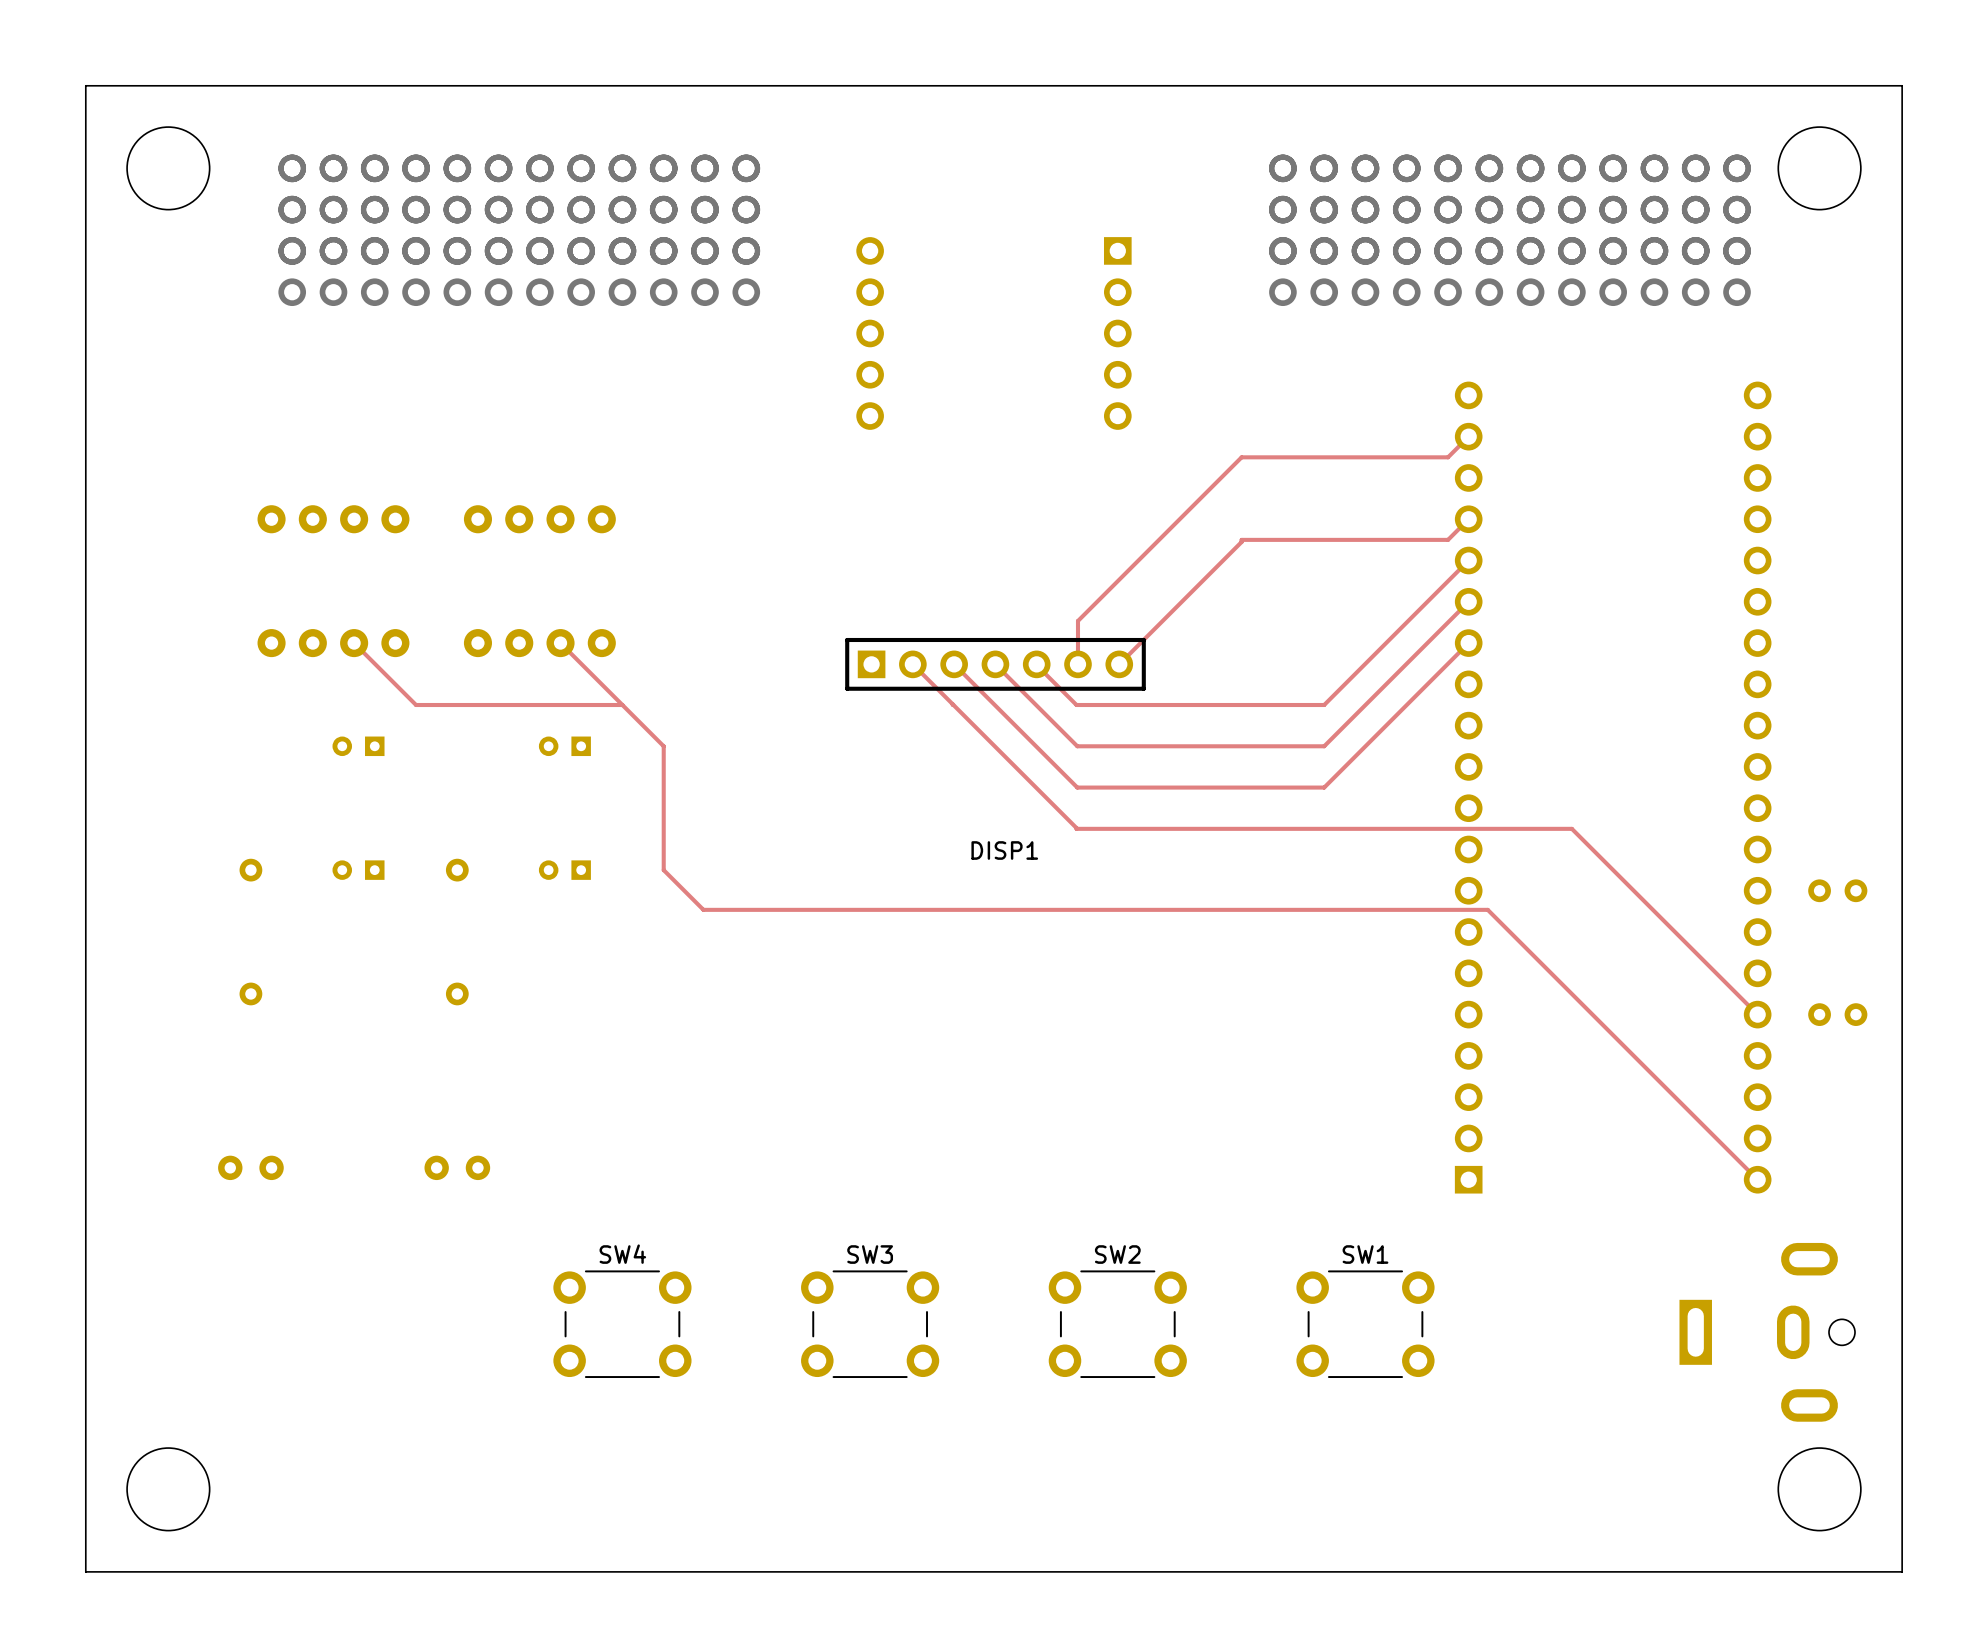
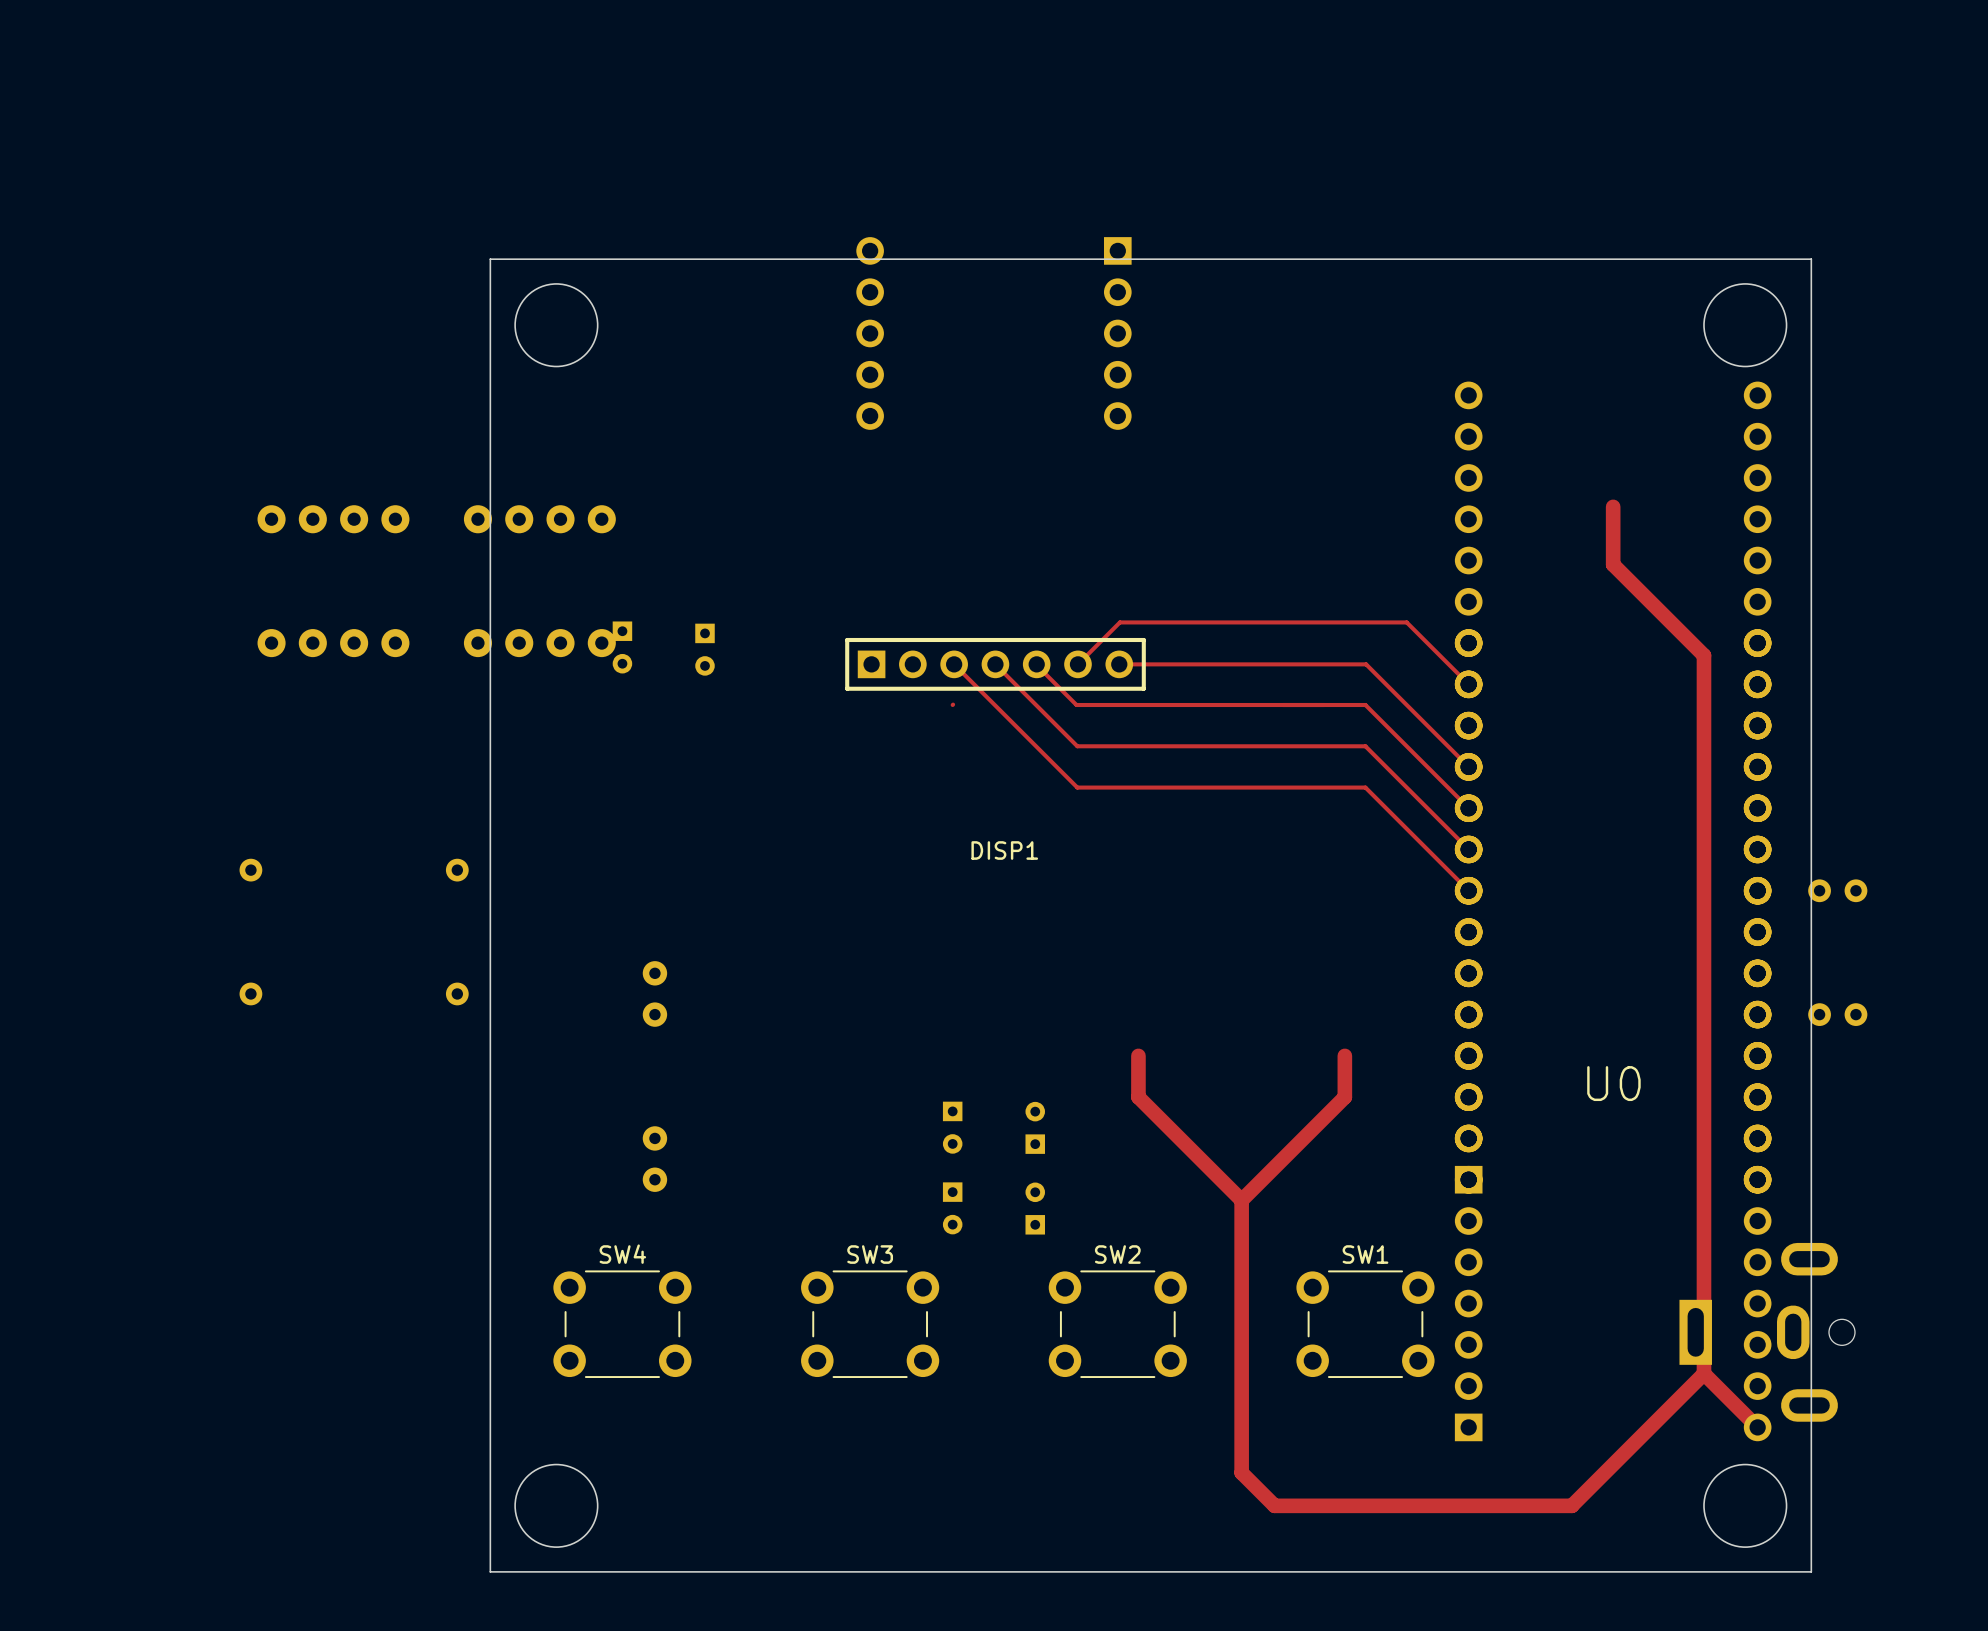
round board edge: [126, 126, 211, 211] -> none
via: (292, 168) -> none
via: (333, 168) -> none
via: (374, 168) -> none
via: (416, 168) -> none
via: (457, 168) -> none
via: (498, 168) -> none
via: (539, 168) -> none
via: (581, 168) -> none
via: (622, 168) -> none
via: (663, 168) -> none
via: (705, 168) -> none
via: (746, 168) -> none
via: (1282, 168) -> none
via: (1324, 168) -> none
via: (1365, 168) -> none
via: (1406, 168) -> none
via: (1448, 168) -> none
via: (1489, 168) -> none
via: (1530, 168) -> none
via: (1571, 168) -> none
via: (1613, 168) -> none
via: (1654, 168) -> none
via: (1695, 168) -> none
via: (1737, 168) -> none
round board edge position: (1819, 168) -> (1745, 325)
via: (292, 209) -> none
via: (333, 209) -> none
via: (374, 209) -> none
via: (416, 209) -> none
via: (457, 209) -> none
via: (498, 209) -> none
via: (539, 209) -> none
via: (581, 209) -> none
via: (622, 209) -> none
via: (663, 209) -> none
via: (705, 209) -> none
via: (746, 209) -> none
via: (1282, 209) -> none
via: (1324, 209) -> none
via: (1365, 209) -> none
via: (1406, 209) -> none
via: (1448, 209) -> none
via: (1489, 209) -> none
via: (1530, 209) -> none
via: (1571, 209) -> none
via: (1613, 209) -> none
via: (1654, 209) -> none
via: (1695, 209) -> none
via: (1737, 209) -> none
via: (292, 250) -> none
via: (333, 250) -> none
via: (374, 250) -> none
via: (416, 250) -> none
via: (457, 250) -> none
via: (498, 250) -> none
via: (539, 250) -> none
via: (581, 250) -> none
via: (622, 250) -> none
via: (663, 250) -> none
via: (705, 250) -> none
via: (746, 250) -> none
via: (1282, 250) -> none
via: (1324, 250) -> none
via: (1365, 250) -> none
via: (1406, 250) -> none
via: (1448, 250) -> none
via: (1489, 250) -> none
via: (1530, 250) -> none
via: (1571, 250) -> none
via: (1613, 250) -> none
via: (1654, 250) -> none
via: (1695, 250) -> none
via: (1737, 250) -> none
round board edge: none -> [514, 283, 599, 368]
via: (292, 292) -> none
via: (333, 292) -> none
via: (374, 292) -> none
via: (416, 292) -> none
via: (457, 292) -> none
via: (498, 292) -> none
via: (539, 292) -> none
via: (581, 292) -> none
via: (622, 292) -> none
via: (663, 292) -> none
via: (705, 292) -> none
via: (746, 292) -> none
via: (1282, 292) -> none
via: (1324, 292) -> none
via: (1365, 292) -> none
via: (1406, 292) -> none
via: (1448, 292) -> none
via: (1489, 292) -> none
via: (1530, 292) -> none
via: (1571, 292) -> none
via: (1613, 292) -> none
via: (1654, 292) -> none
via: (1695, 292) -> none
via: (1737, 292) -> none
track: (1468, 436) (1448, 457) (1241, 457) (1077, 620) (1077, 664) -> (1468, 684) (1406, 622) (1119, 622) (1077, 664)
track: none -> (1613, 506) (1613, 564) (1703, 655) (1703, 1373)
track: (1468, 519) (1448, 539) (1241, 539) (1119, 664) -> (1468, 766) (1366, 664) (1119, 664)
track: (1468, 560) (1324, 705) -> (1468, 808) (1365, 705) (1324, 705)
track: (1468, 601) (1324, 746) -> (1468, 849) (1365, 746) (1324, 746)
track: (354, 643) (416, 705) (622, 705) -> none
track: (560, 643) (663, 746) (663, 870) (703, 909) (1487, 909) (1757, 1179) -> none
track: (1468, 643) (1324, 787) -> (1468, 890) (1365, 787) (1324, 787)
part: none -> (622, 647)
part: none -> (705, 649)
track: (912, 664) (1076, 828) (1571, 828) (1757, 1014) -> none
part: (358, 746) -> none
part: (564, 746) -> none
part: (358, 870) -> none
part: (564, 870) -> none
part: none -> (654, 993)
U0: none -> (1613, 1035)
track: none -> (1138, 1055) (1138, 1097) (1241, 1200)
track: none -> (1344, 1055) (1344, 1097) (1241, 1200)
part: none -> (952, 1127)
part: none -> (1035, 1127)
part: none -> (654, 1159)
part: (250, 1167) -> none
part: (457, 1167) -> none
track: none -> (1241, 1200) (1241, 1472) (1274, 1505) (1571, 1505) (1703, 1373)
part: none -> (952, 1208)
part: none -> (1035, 1208)
track: none -> (1703, 1373) (1757, 1427)
round board edge position: (168, 1489) -> (556, 1505)
round board edge position: (1819, 1489) -> (1745, 1505)
board edge: (490, 1571) (85, 1571) (85, 85) (1902, 85) (1902, 1571) (1811, 1571) -> (490, 1571) (490, 259) (1811, 259) (1811, 1571)

